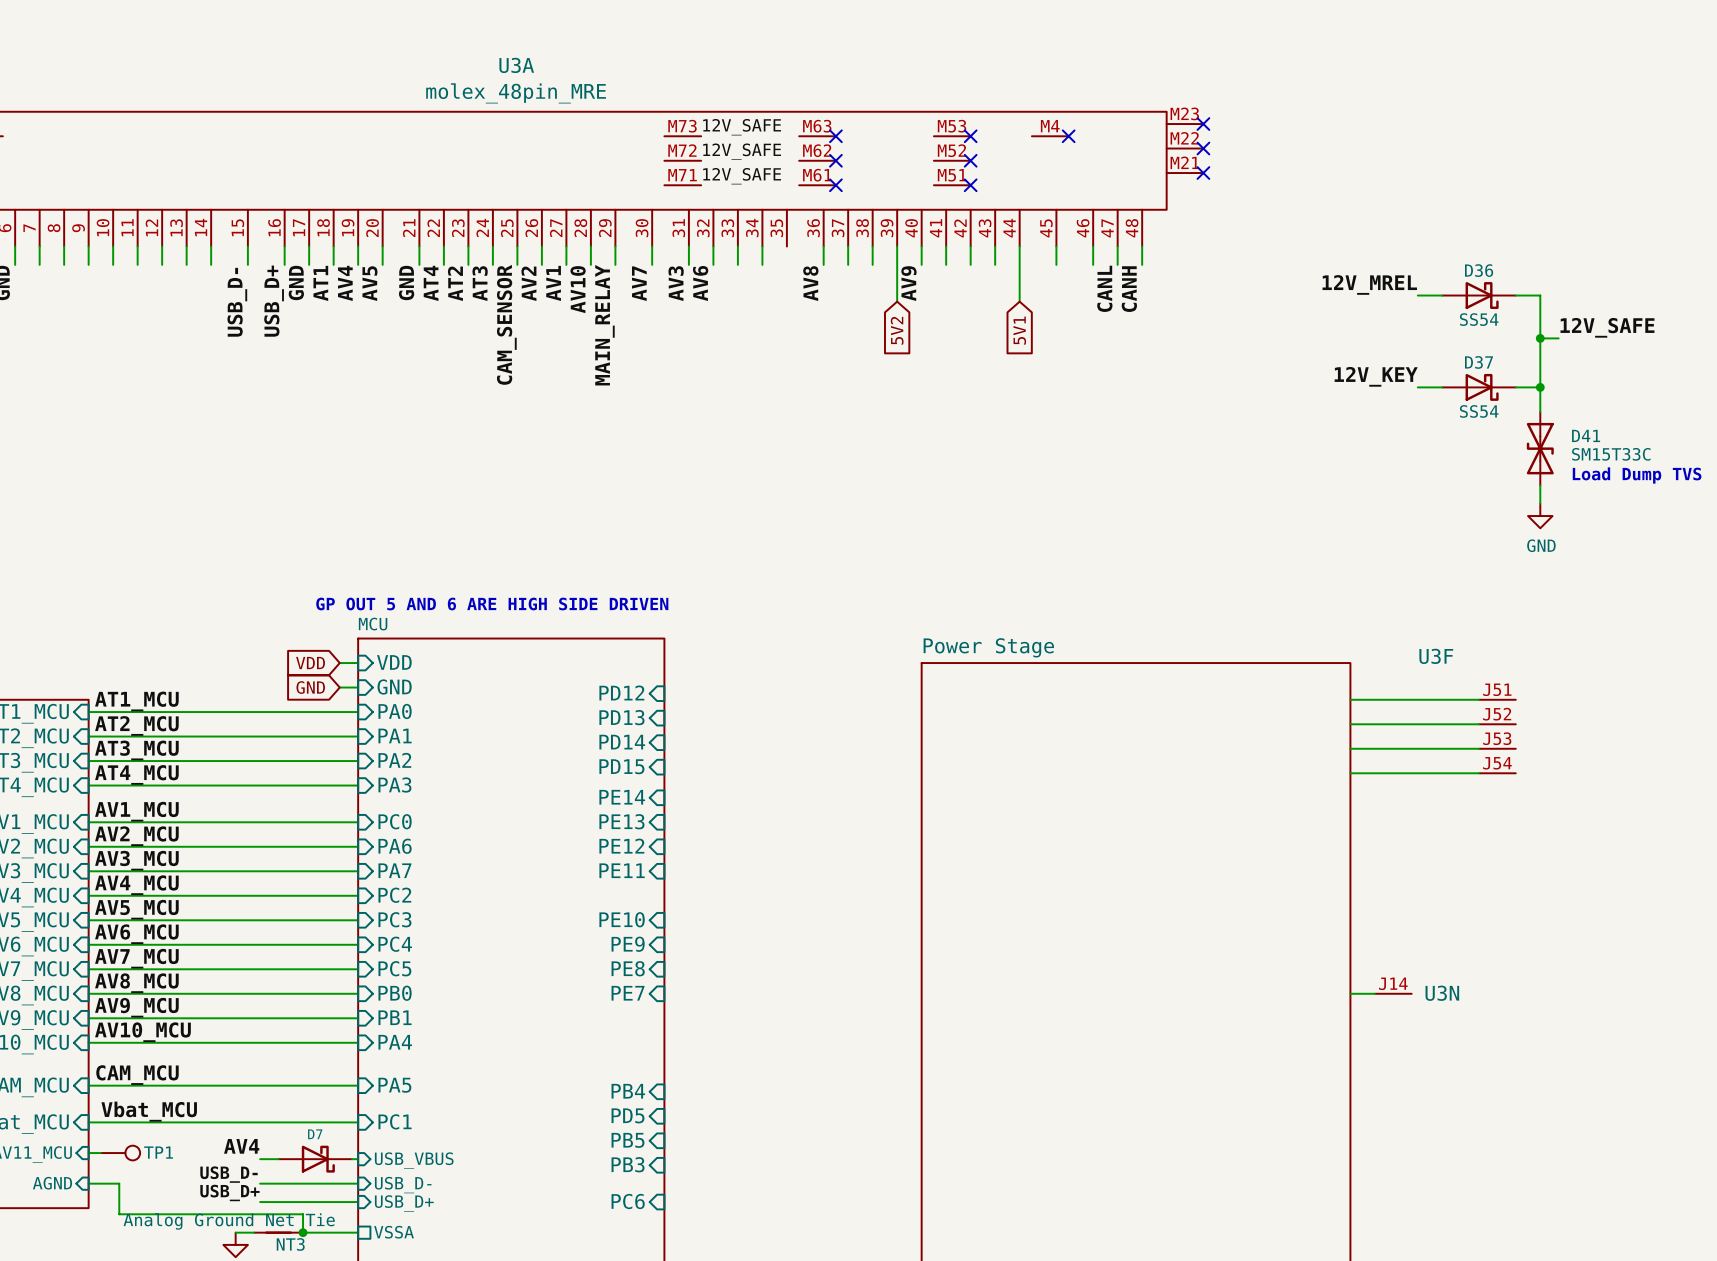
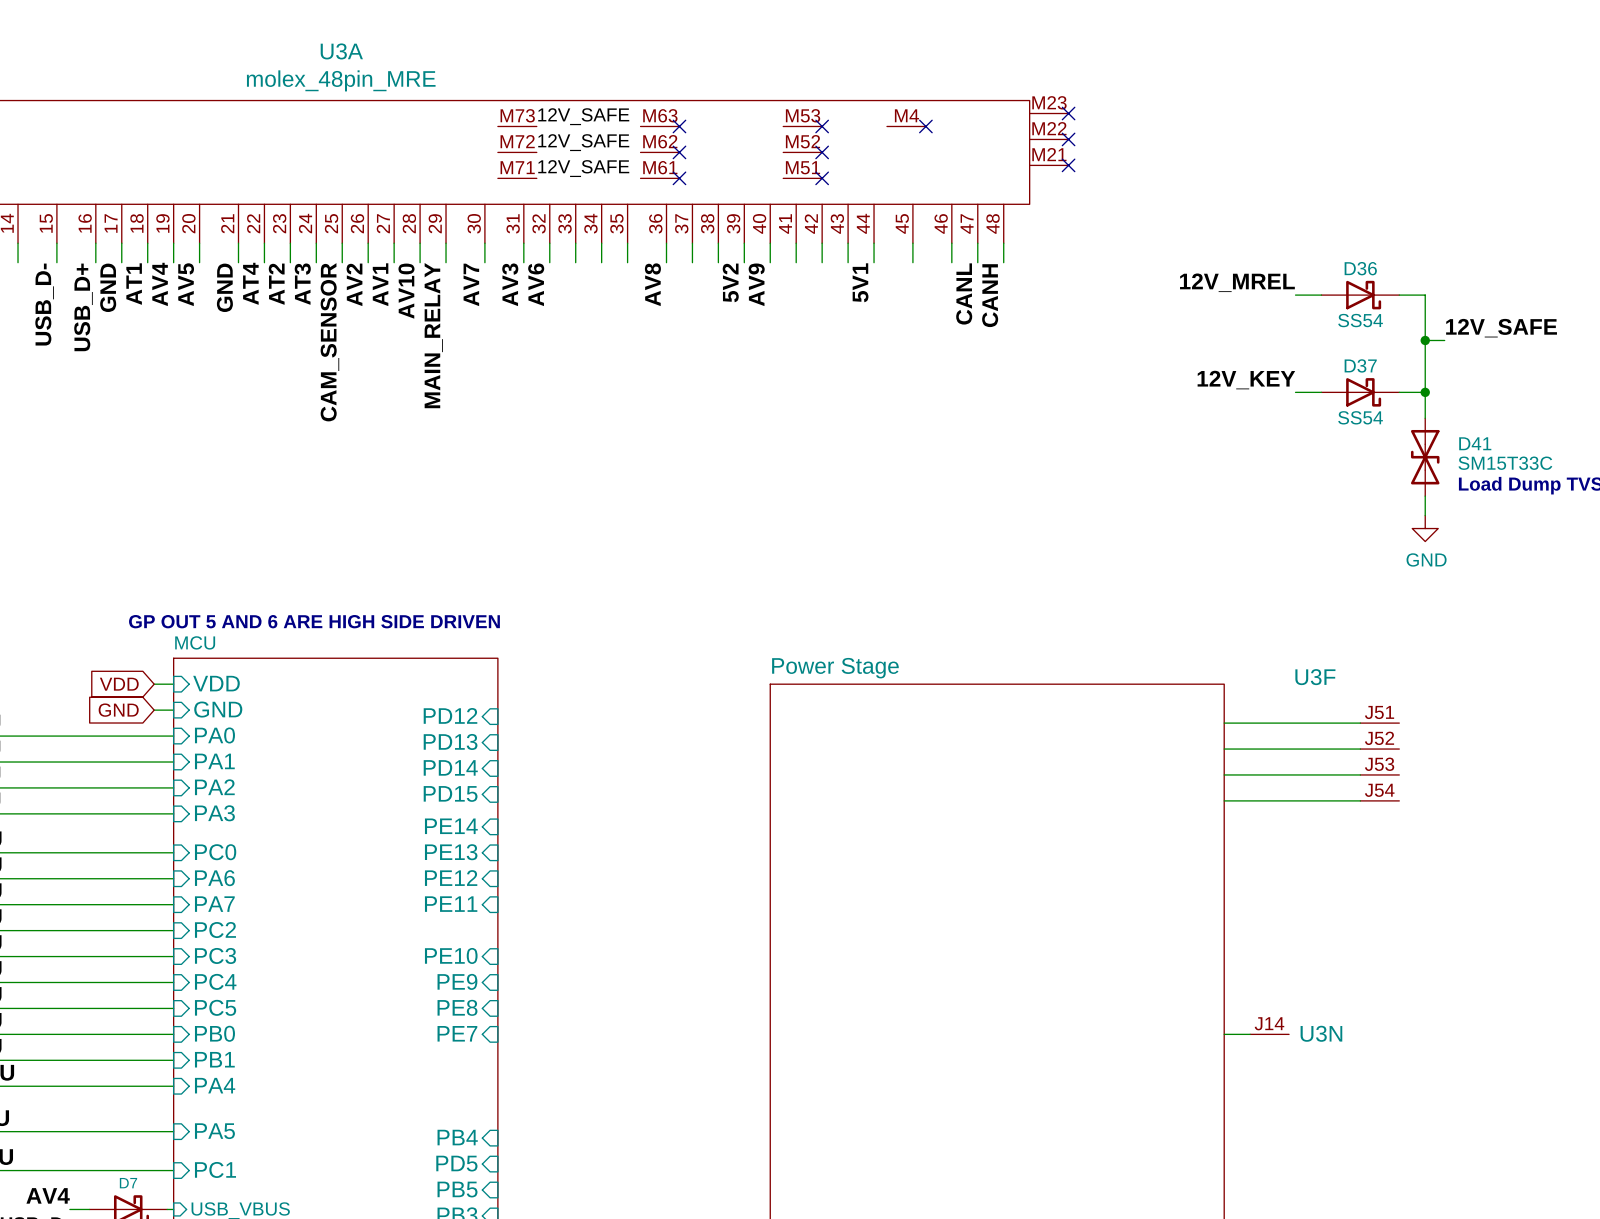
wire: none -> (627, 243) (627, 262)
wire: (897, 264) (897, 301) -> none
wire: (1019, 264) (1019, 301) -> none
label: none -> 5V1 (860, 282)
label: none -> 5V2 (730, 282)
global label: 5V2 (897, 330) -> none
global label: 5V1 (1019, 330) -> none

